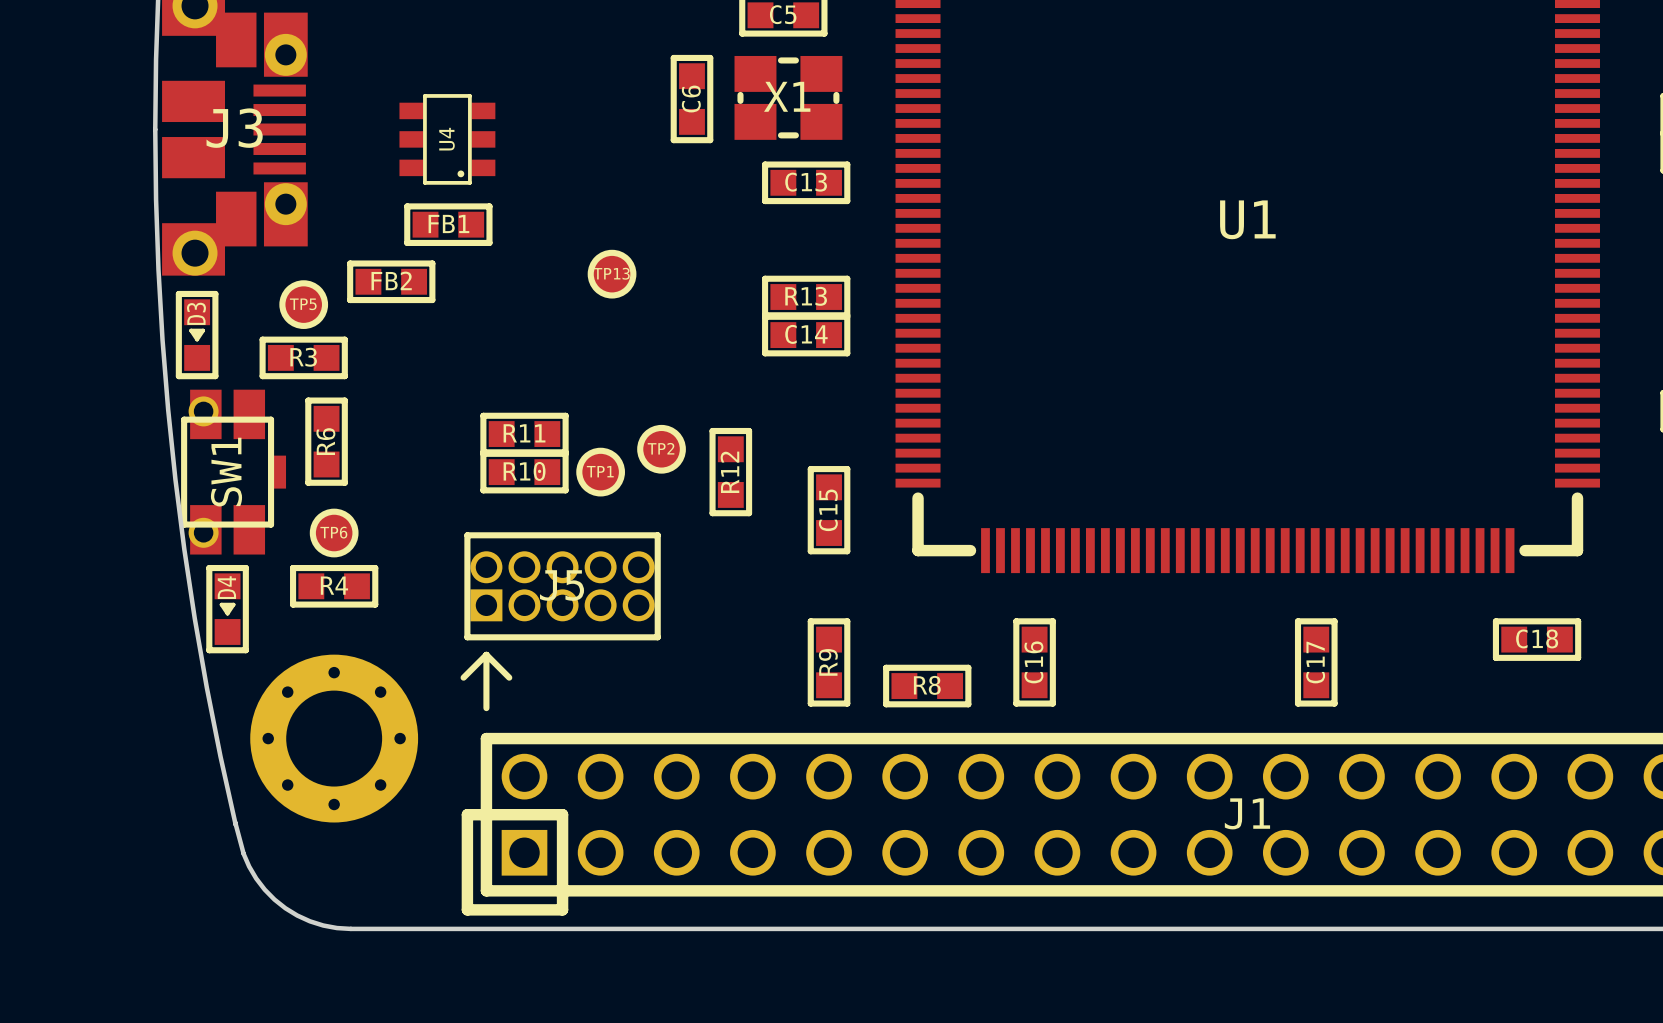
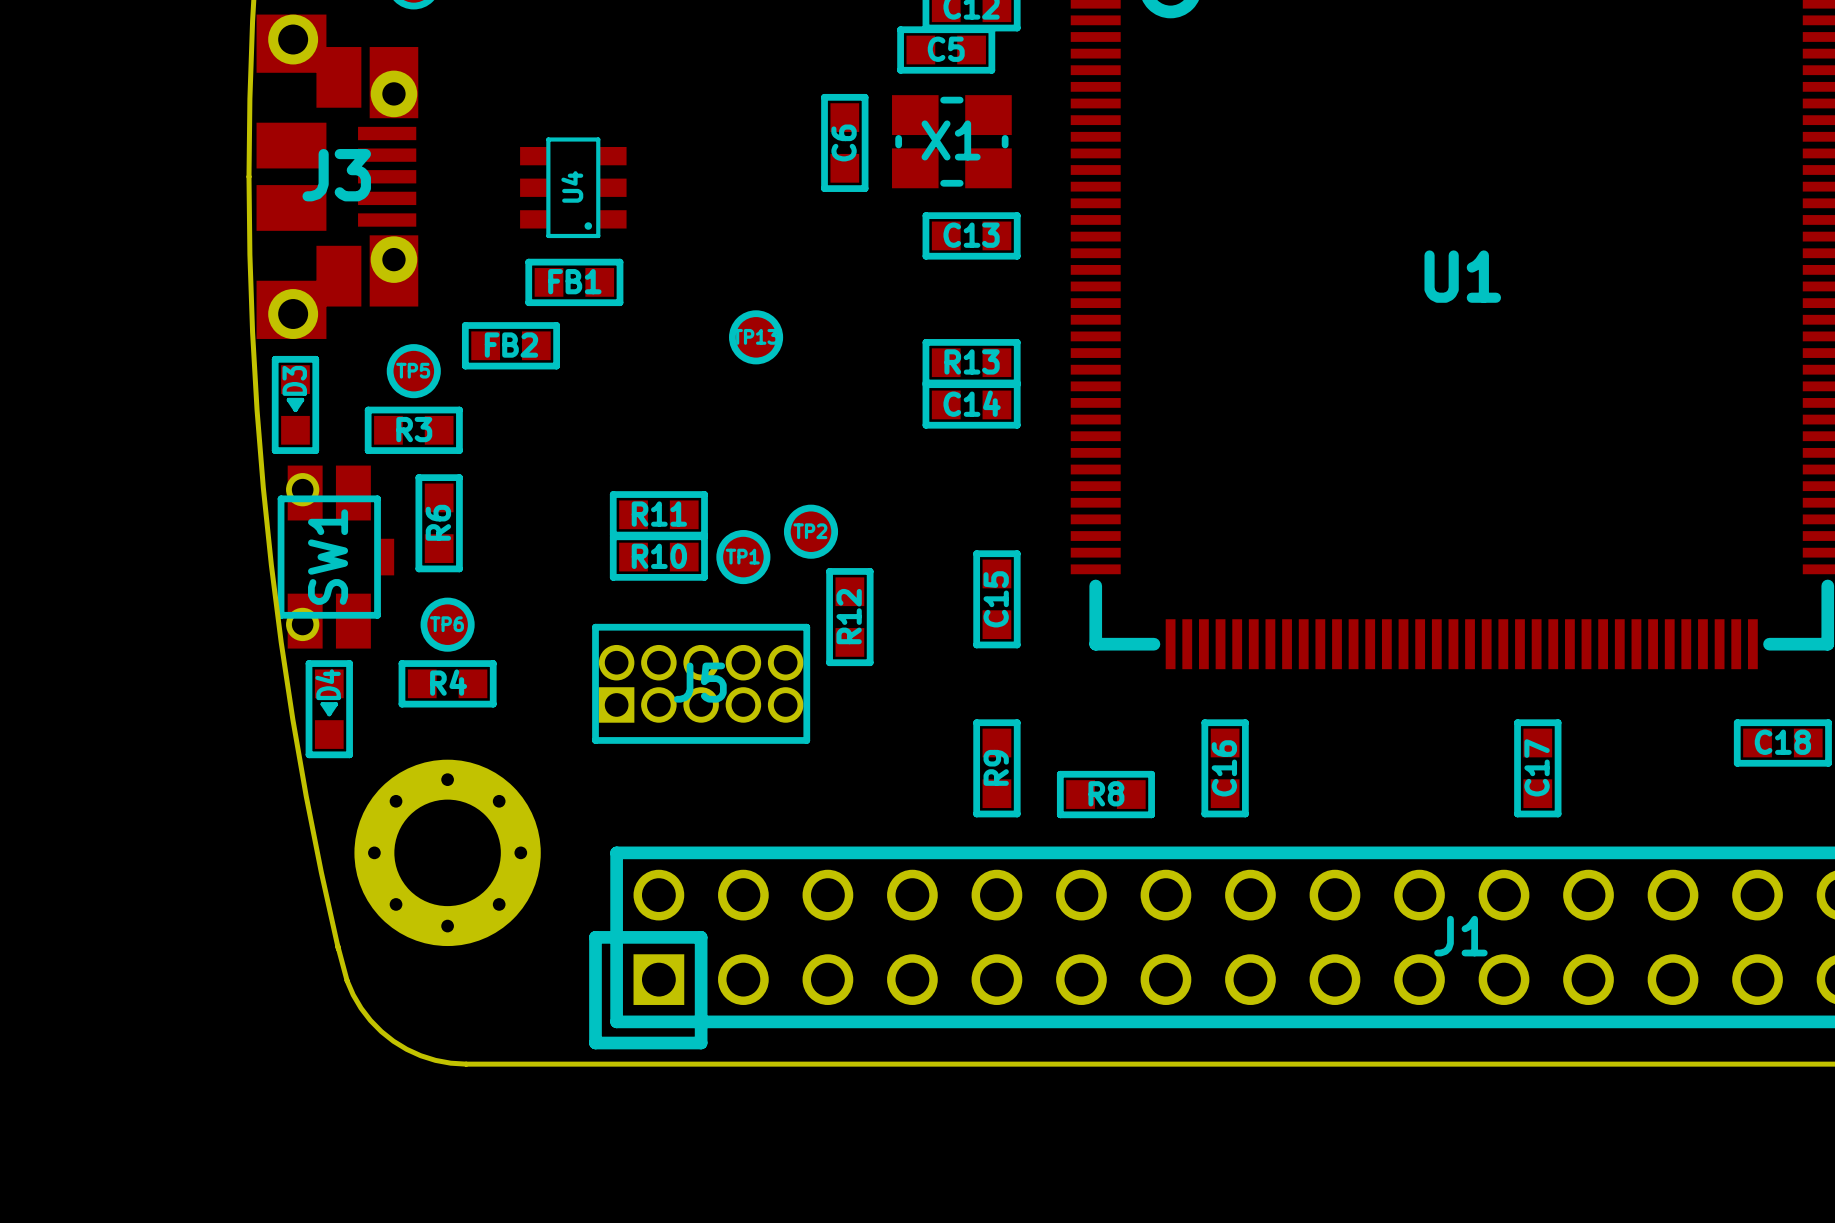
R12 position: (730, 472) -> (849, 617)
line: (486, 654) (486, 708) -> none
line: (486, 654) (509, 677) -> none
line: (486, 654) (463, 677) -> none

